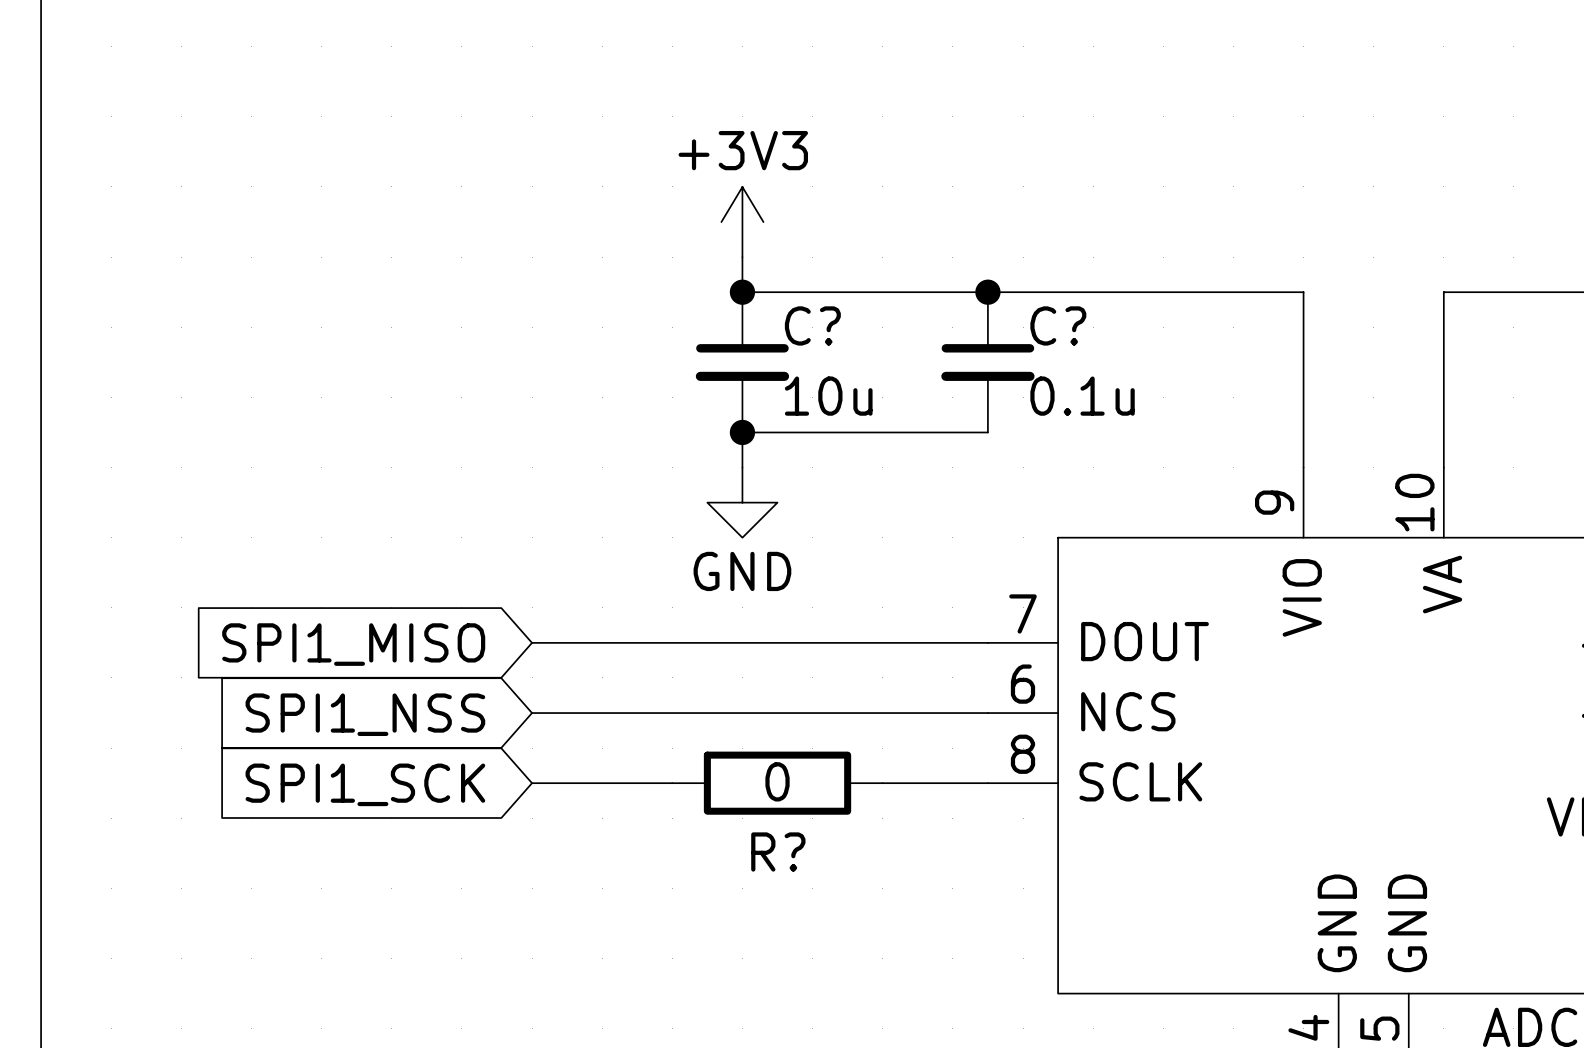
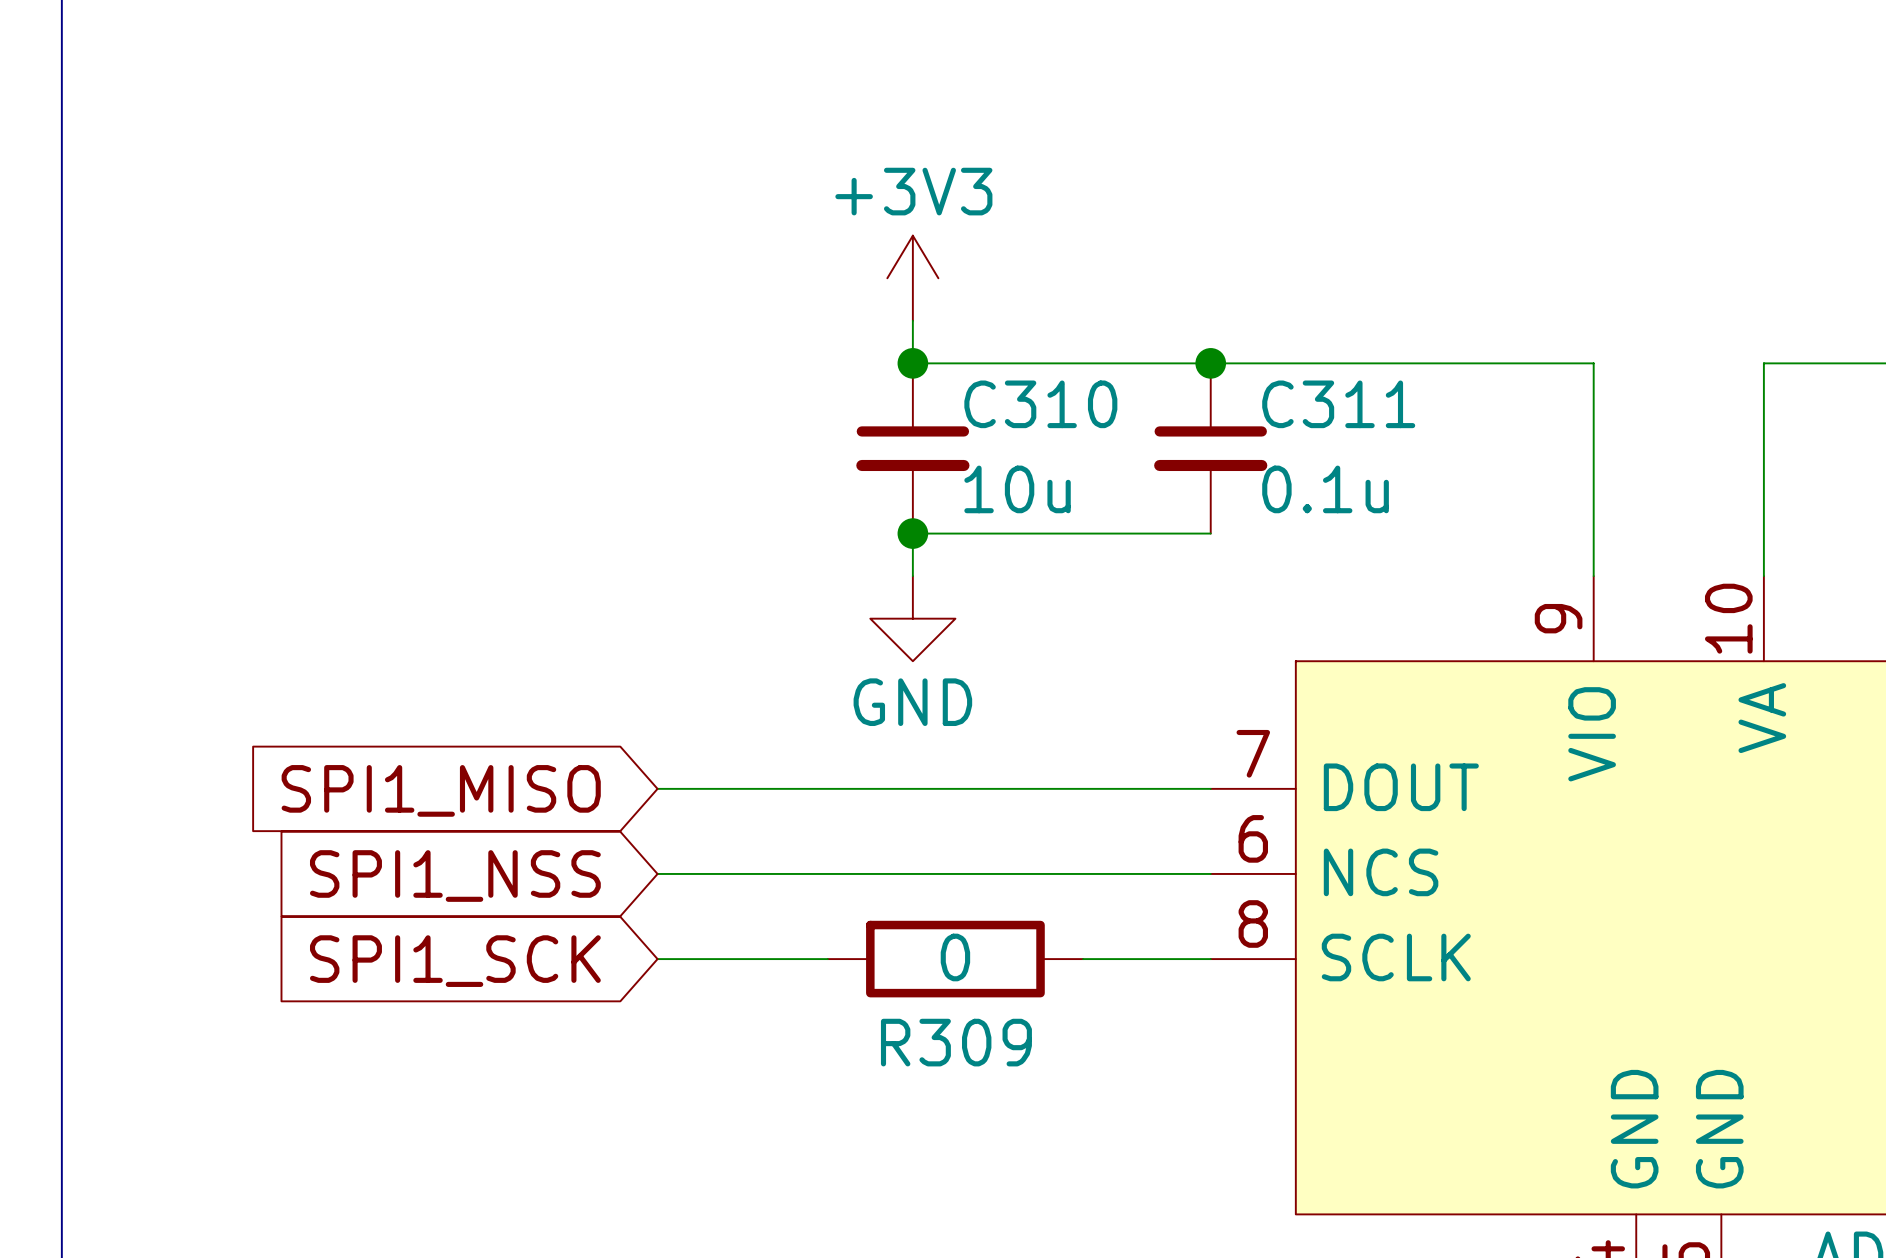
C? name: C? (812, 325) -> C310 (1040, 404)
C? name: C? (1058, 325) -> C311 (1338, 404)
R? name: R? (778, 852) -> R309 (956, 1042)

